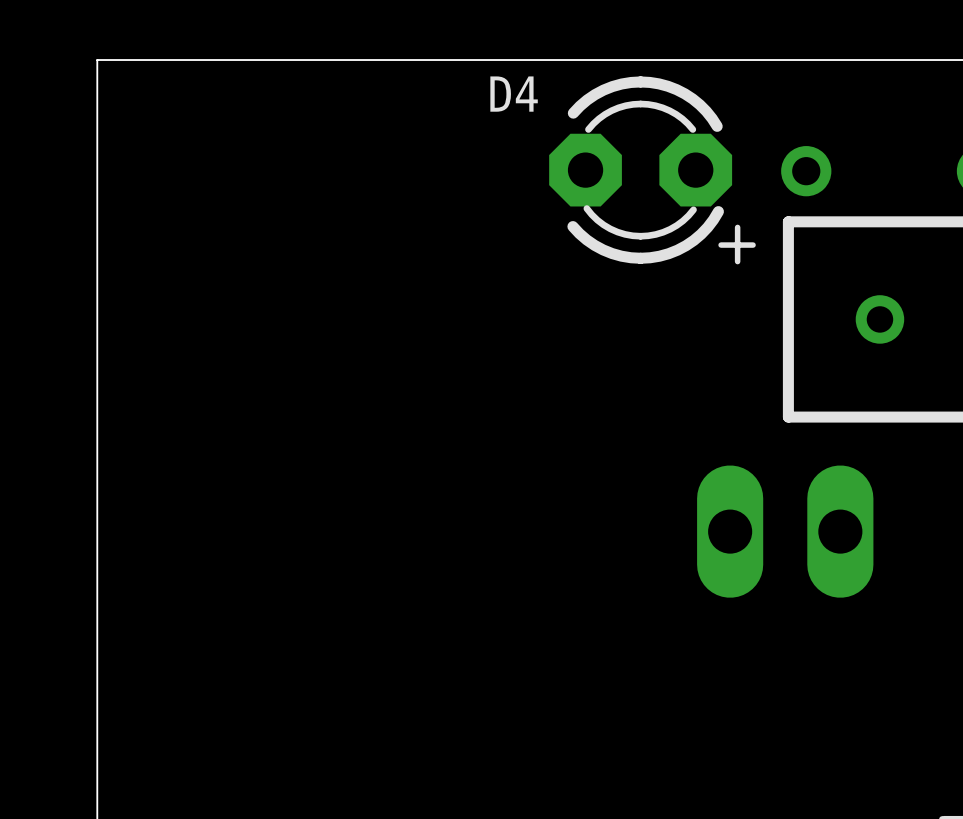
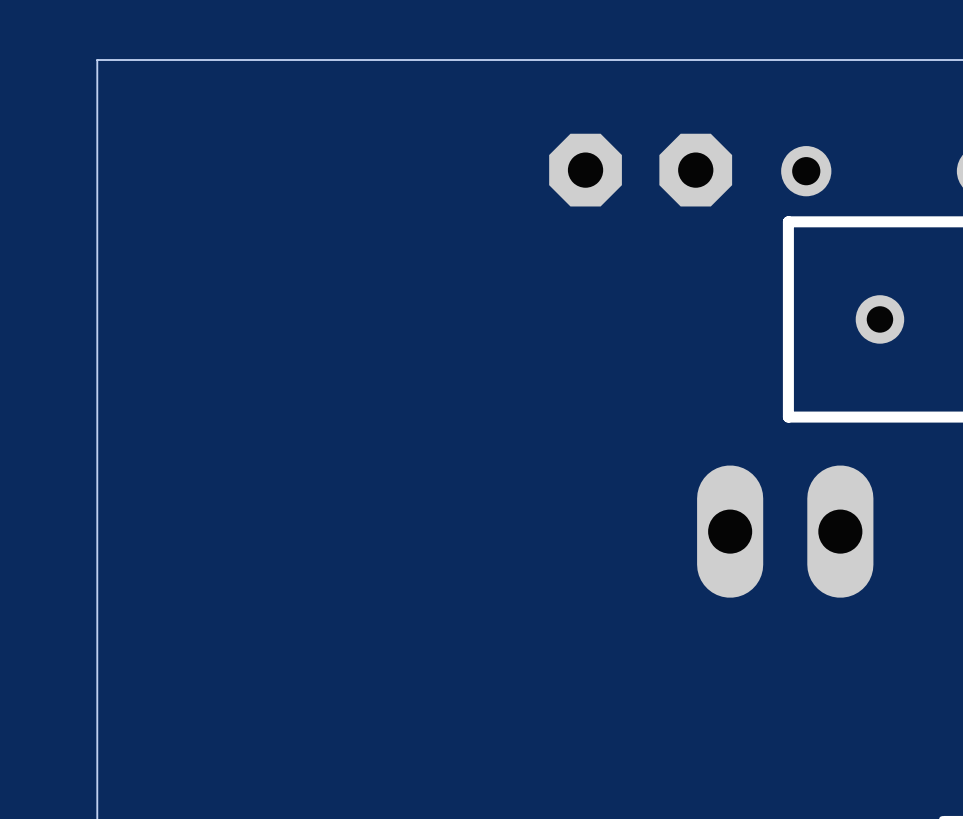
D4 side: bottom (652, 170) -> top (640, 170)

